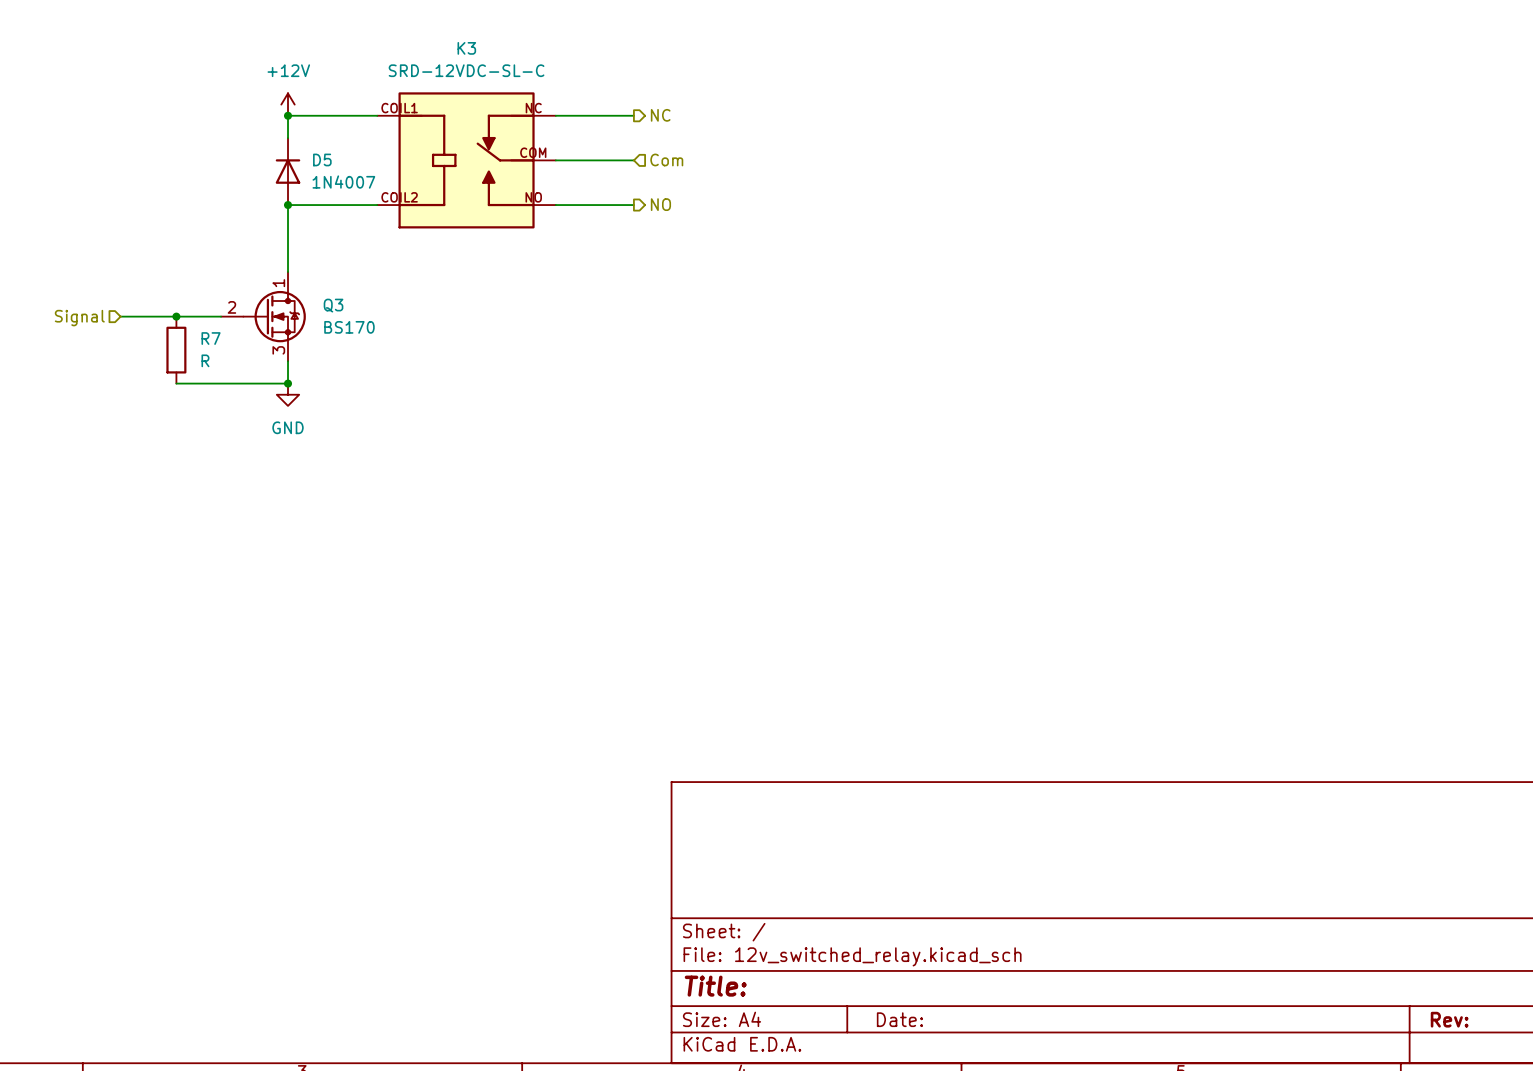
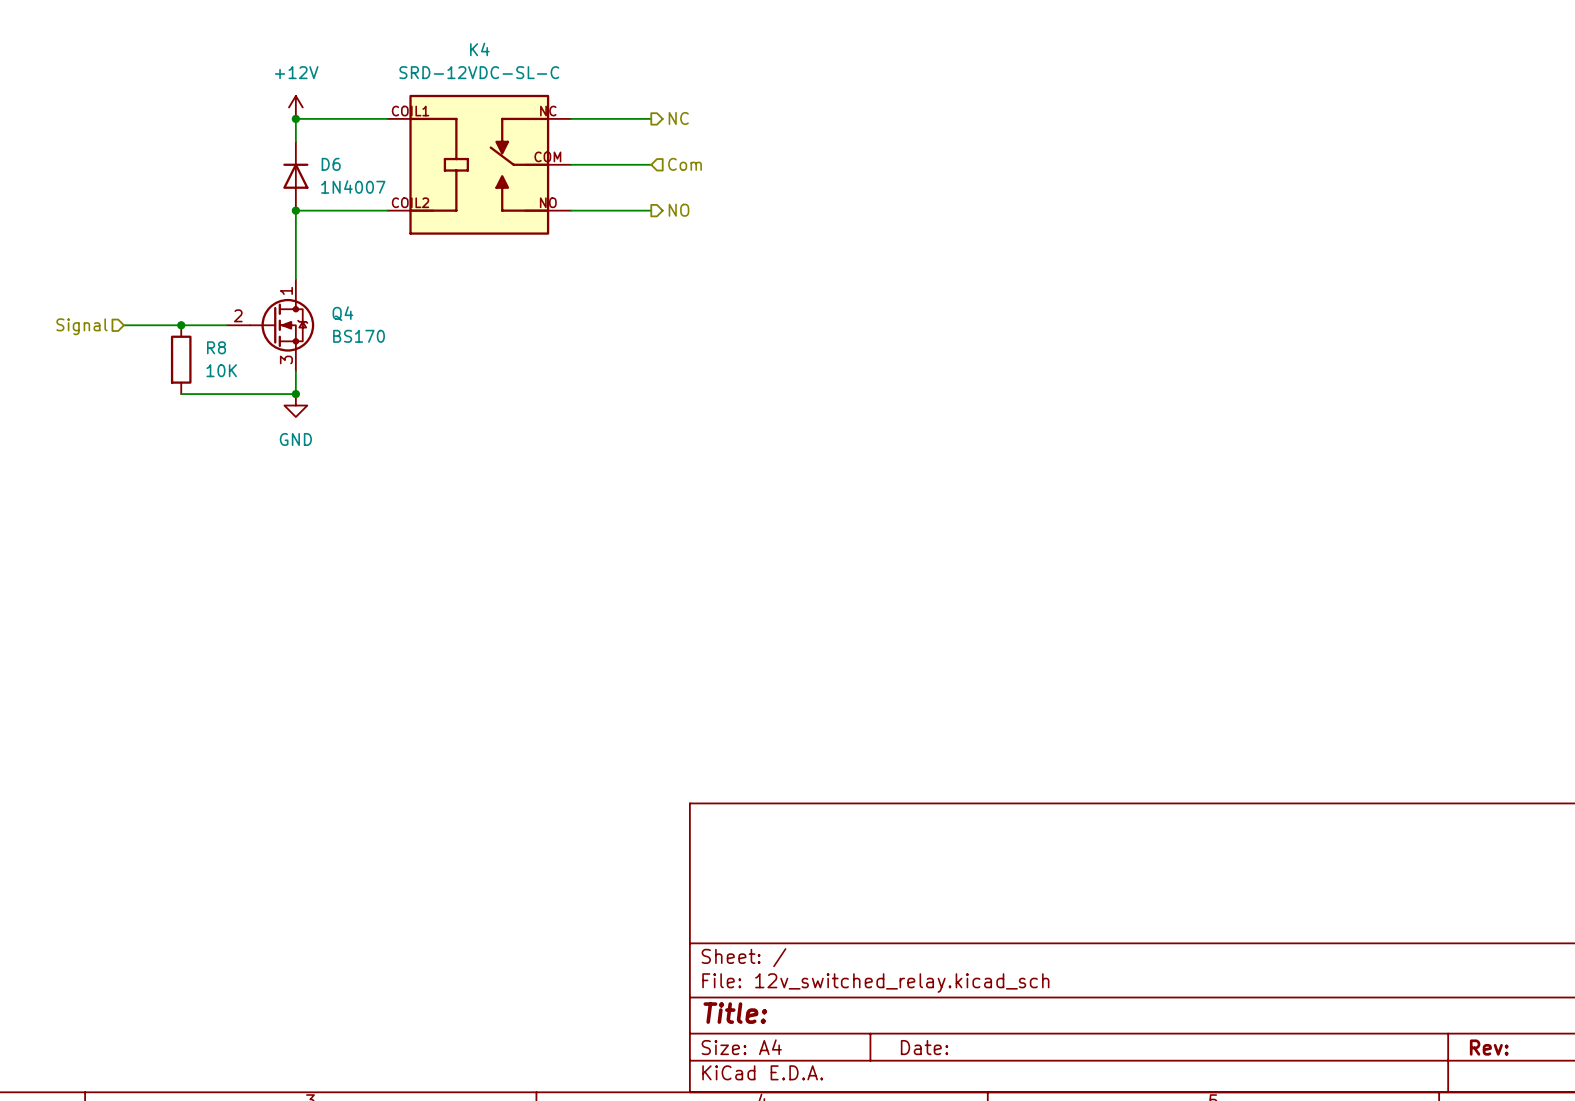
K3 name: K3 (466, 48) -> K4 (479, 49)
D5 name: D5 (322, 159) -> D6 (331, 164)
Q3 name: Q3 (333, 305) -> Q4 (342, 313)
R7 name: R7 (211, 338) -> R8 (216, 347)
R7 value: R (205, 360) -> 10K (221, 370)

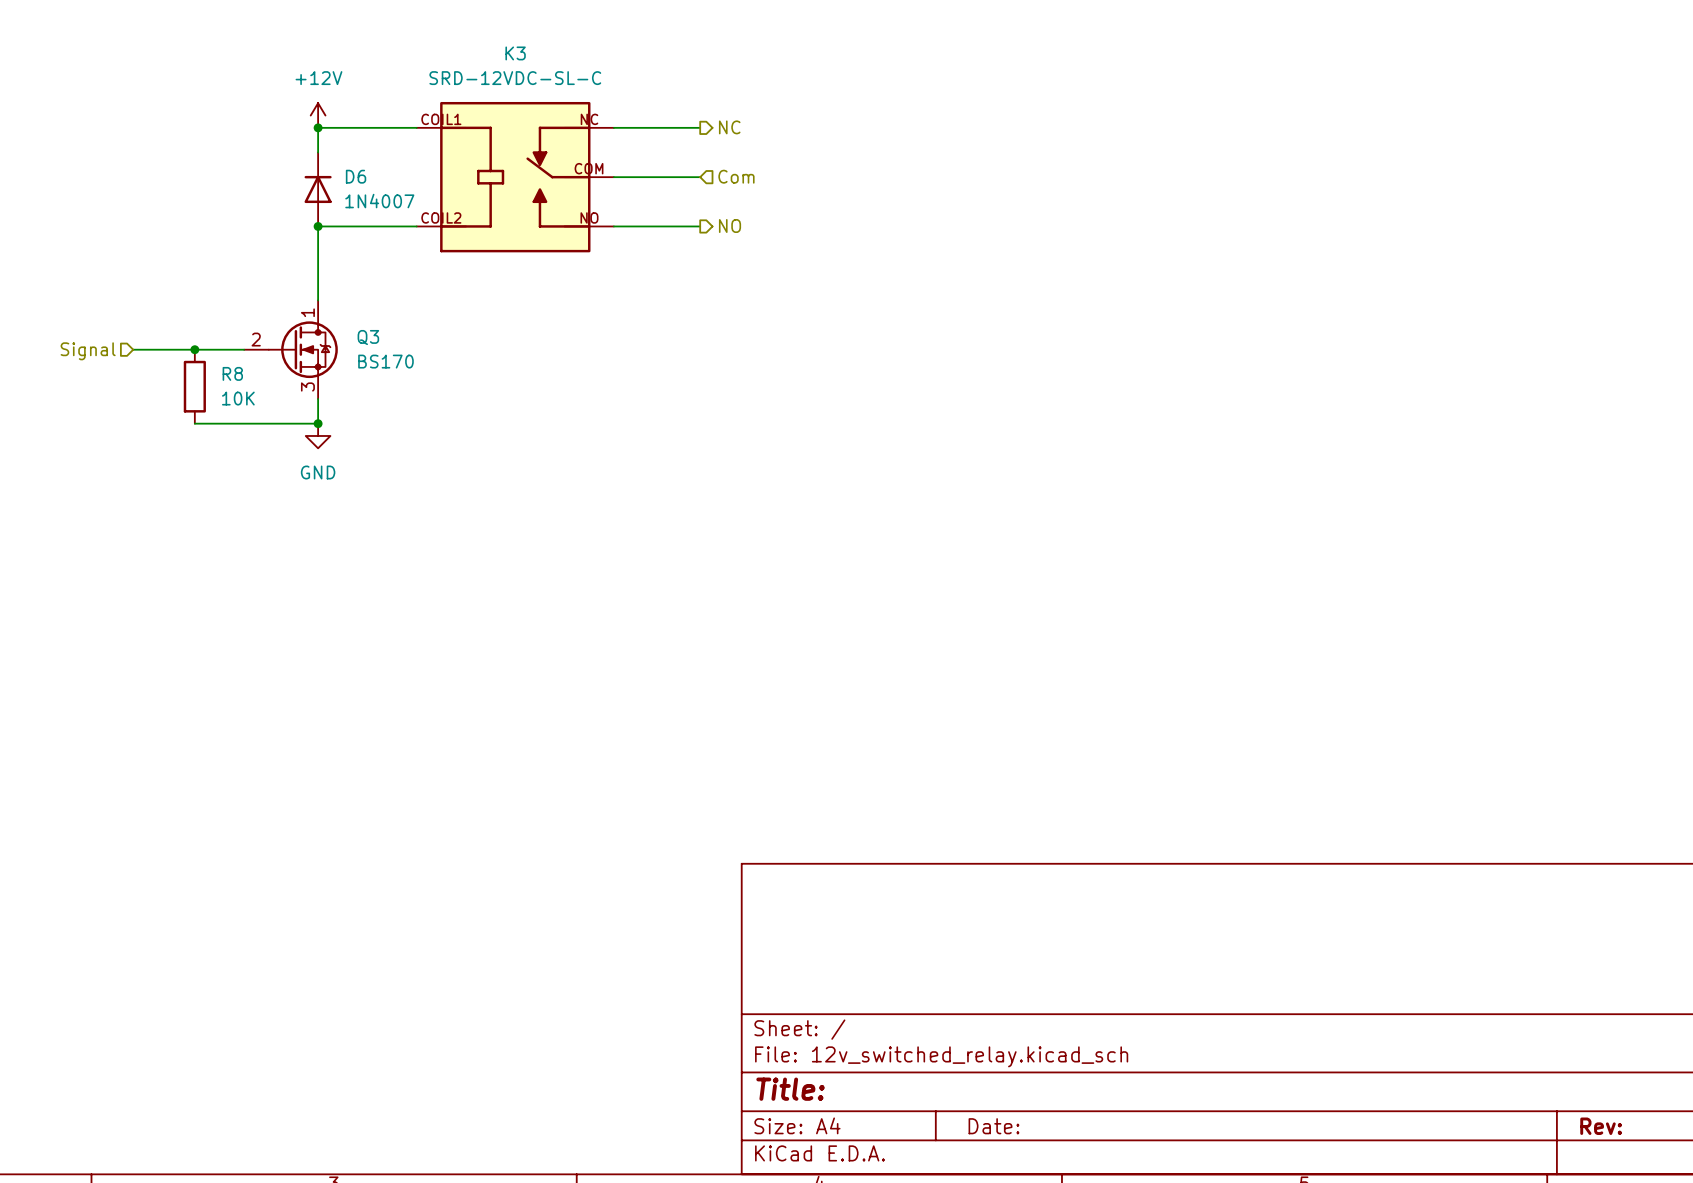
K4 name: K4 (479, 49) -> K3 (515, 53)
Q4 name: Q4 (342, 313) -> Q3 (368, 337)

